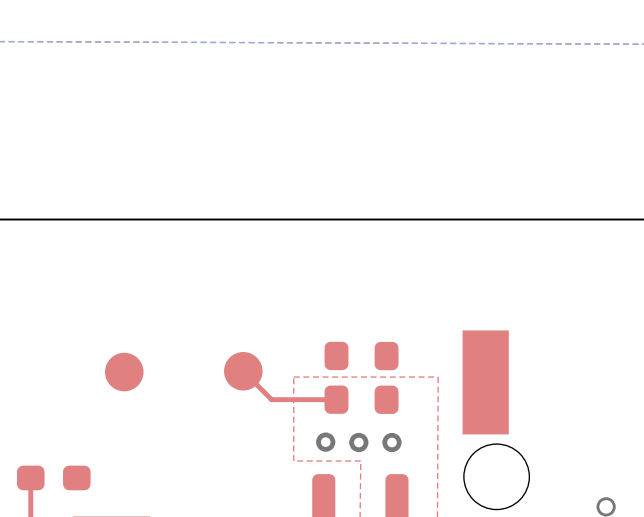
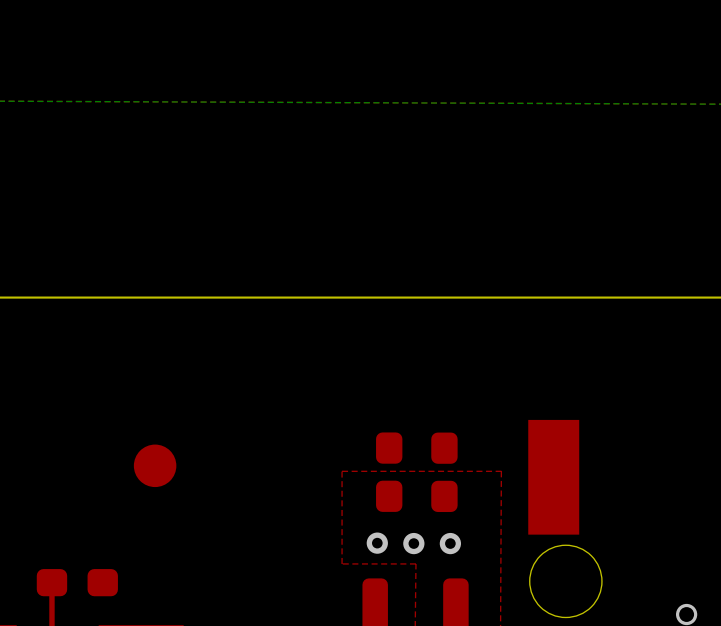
top track: (243, 371) (271, 399) (336, 399) -> none
part: (243, 371) -> none

